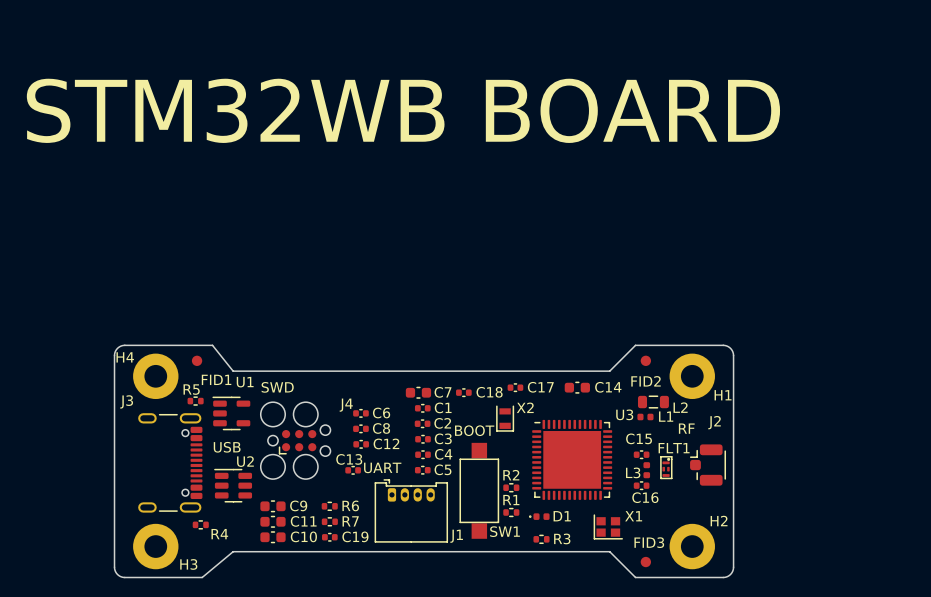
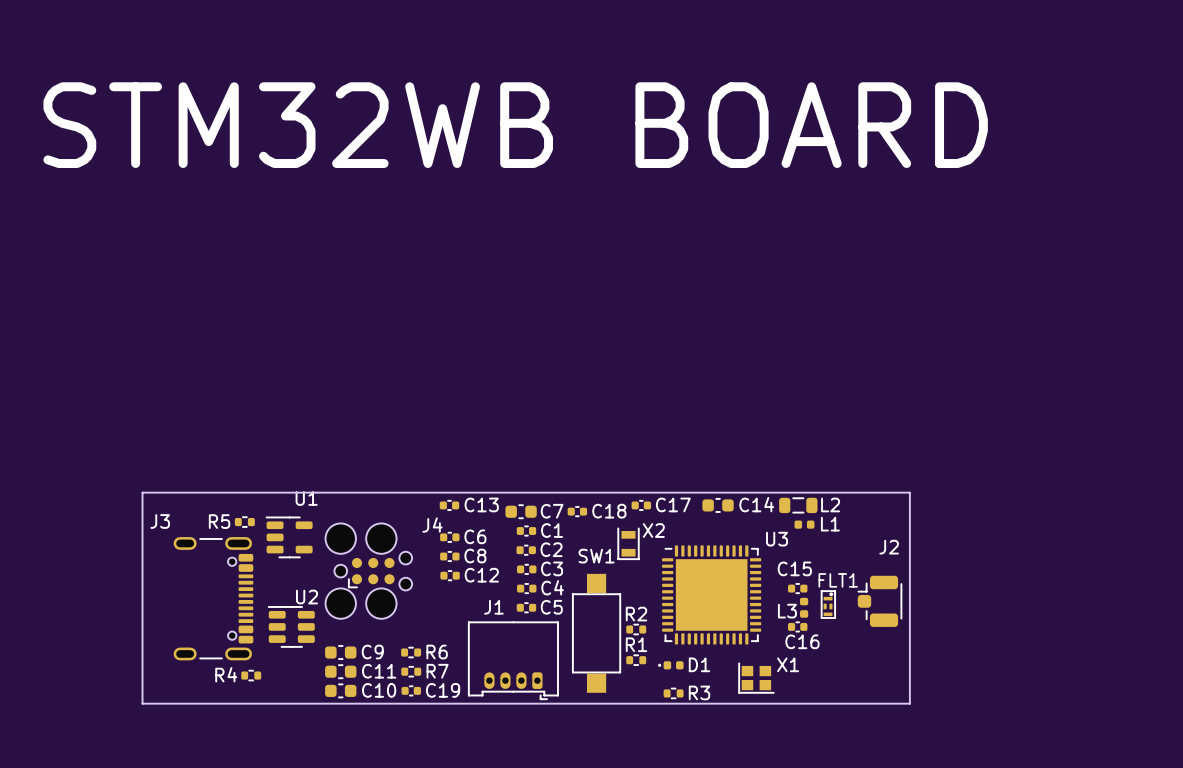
text position: STM32WB BOARD (403, 110) -> STM32WB BOARD (515, 125)
board edge: (124, 345) (212, 345) (233, 371) (609, 371) (635, 345) (727, 346) (731, 349) (733, 355) (732, 571) (729, 575) (723, 577) (635, 577) (609, 551) (233, 551) (202, 577) (120, 576) (116, 573) (114, 567) (114, 355) (117, 348) (124, 345) -> (142, 492) (142, 703) (909, 703) (909, 492) (142, 492)
FID1: (197, 360) -> none
FID2: (645, 360) -> none
H4: (155, 376) -> none
H1: (692, 376) -> none
text: SWD (277, 387) -> none
R5 name position: R5 (191, 389) -> R5 (219, 521)
L2 position: (653, 402) -> (798, 505)
L2 name position: L2 (680, 407) -> L2 (830, 504)
L1 position: (645, 416) -> (804, 524)
text: RF (686, 428) -> none
text: BOOT (474, 430) -> none
text: USB (227, 447) -> none
C13 name position: C13 (349, 459) -> C13 (481, 504)
text: UART (382, 467) -> none
C13 position: (353, 470) -> (449, 505)
J1 rotation: 0° (411, 510) -> 180° (513, 660)
SW1 name position: SW1 (505, 531) -> SW1 (596, 556)
R4 name position: R4 (219, 534) -> R4 (226, 674)
J1 name position: J1 (456, 536) -> J1 (493, 607)
H3: (155, 546) -> none
H2: (692, 546) -> none
FID3: (645, 562) -> none

